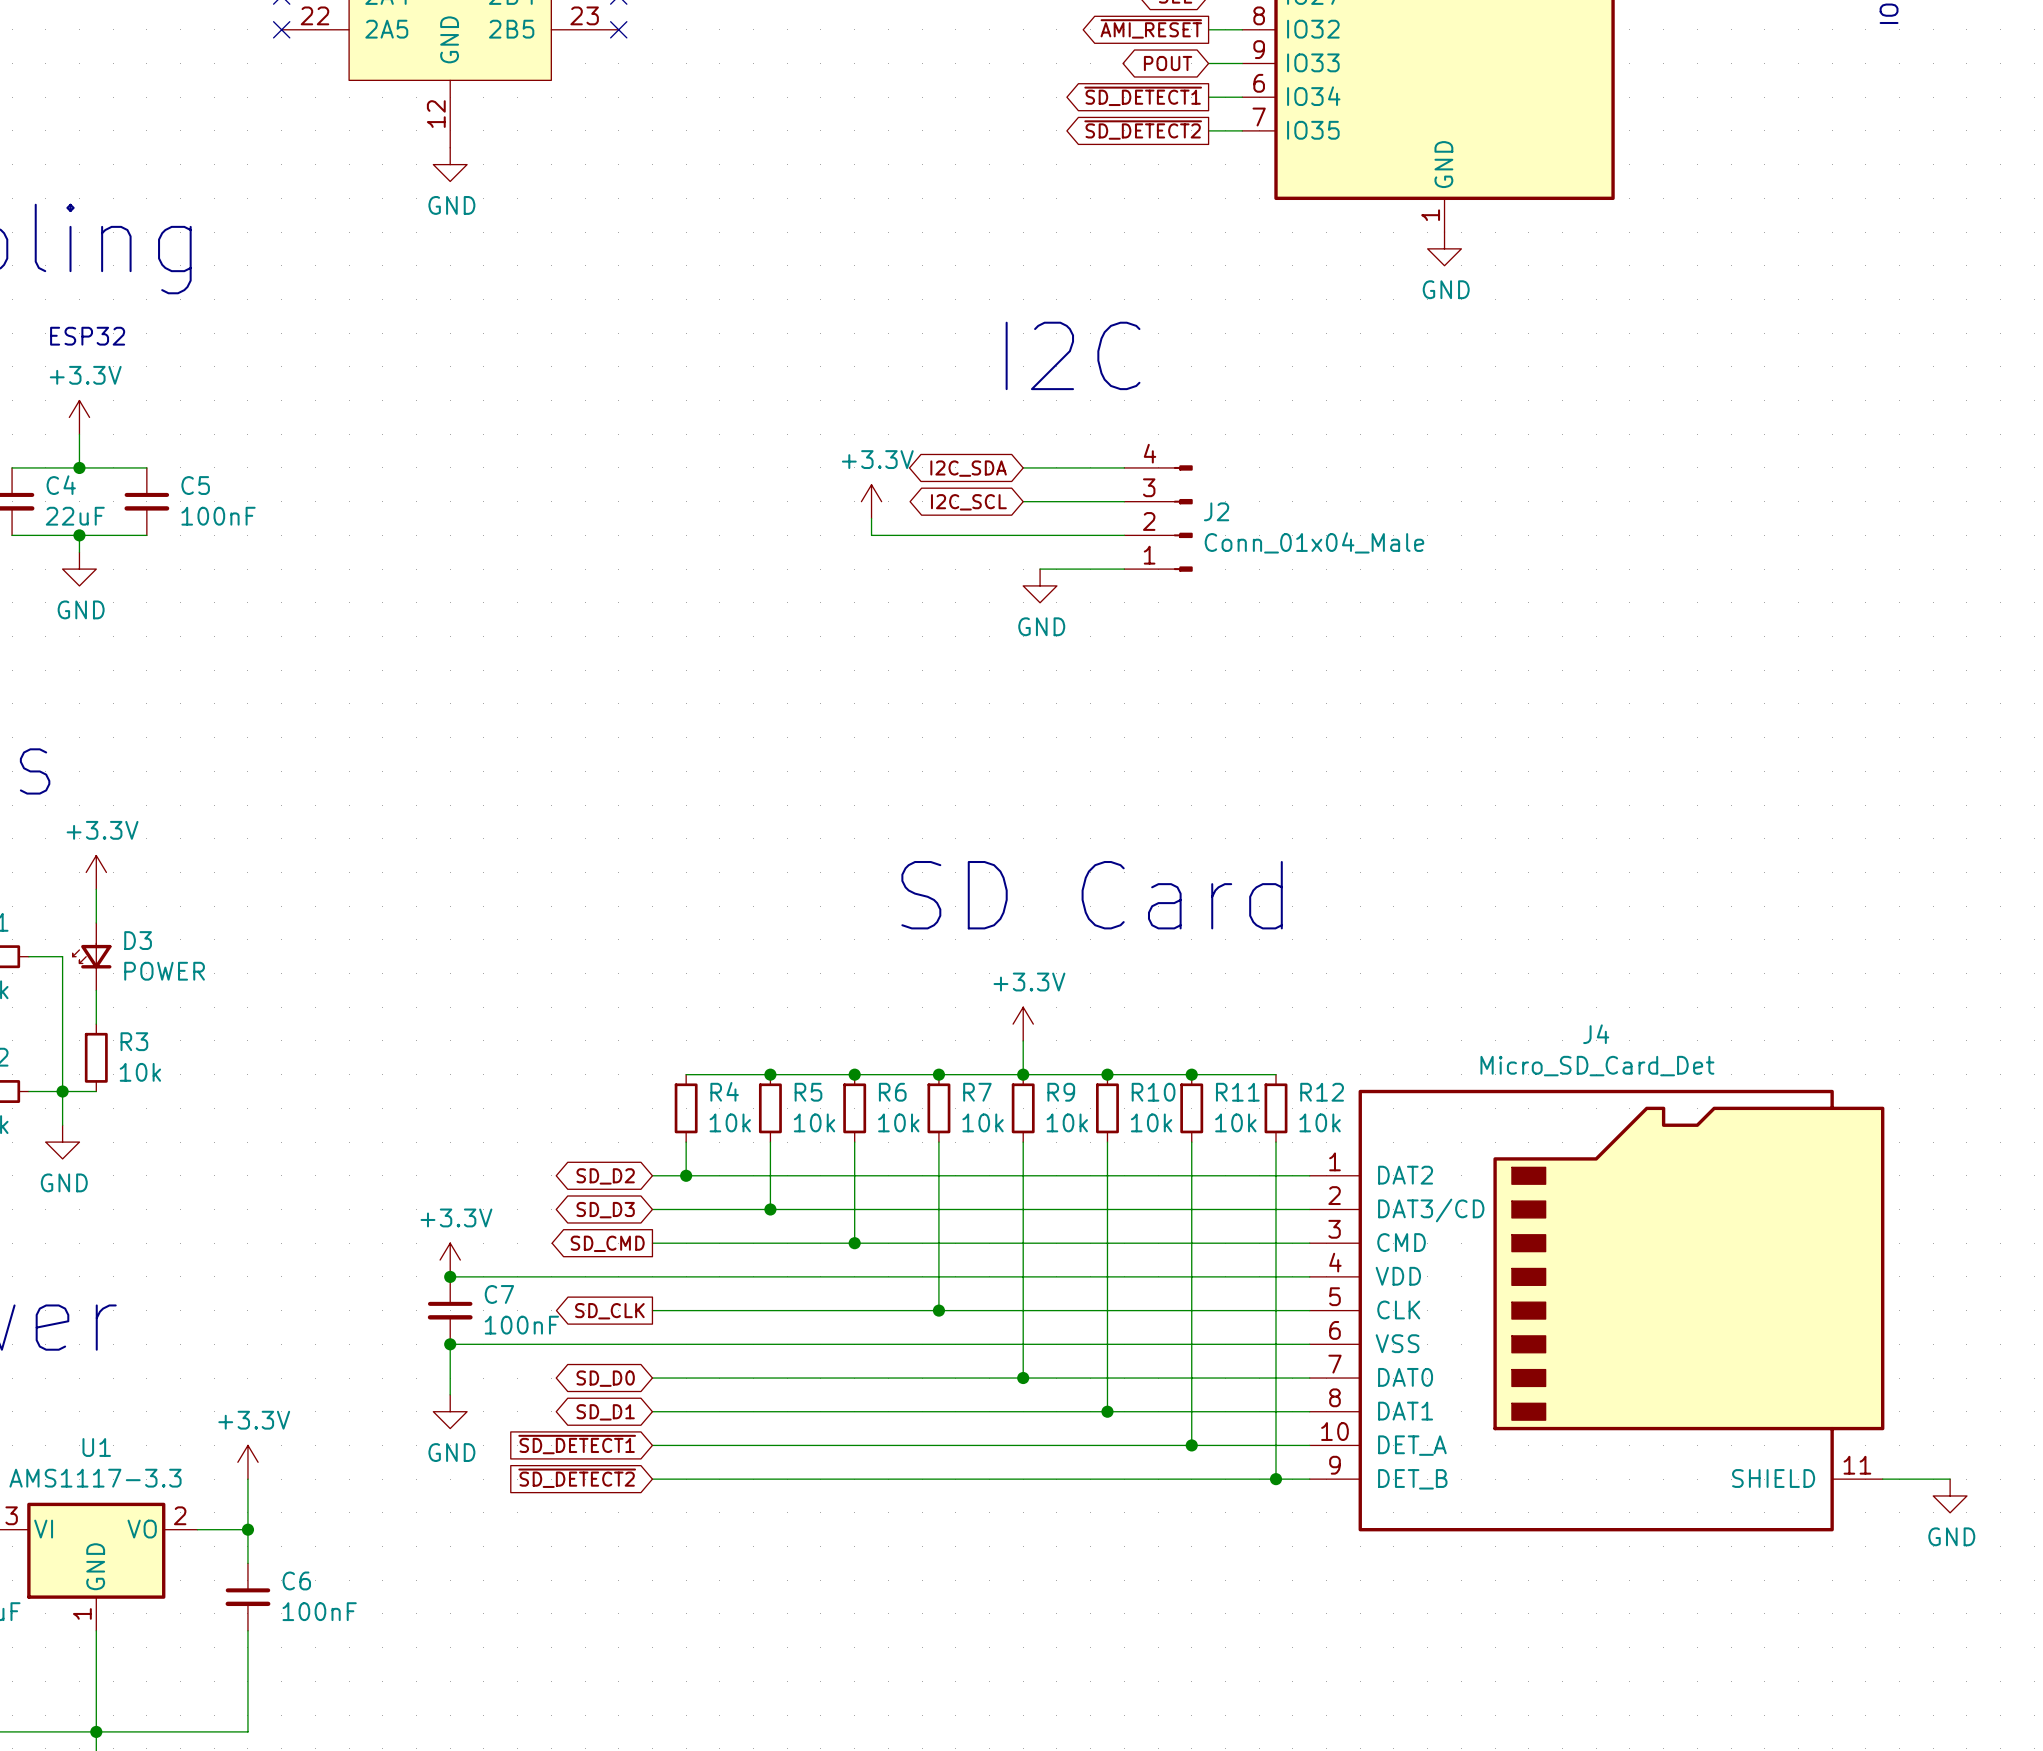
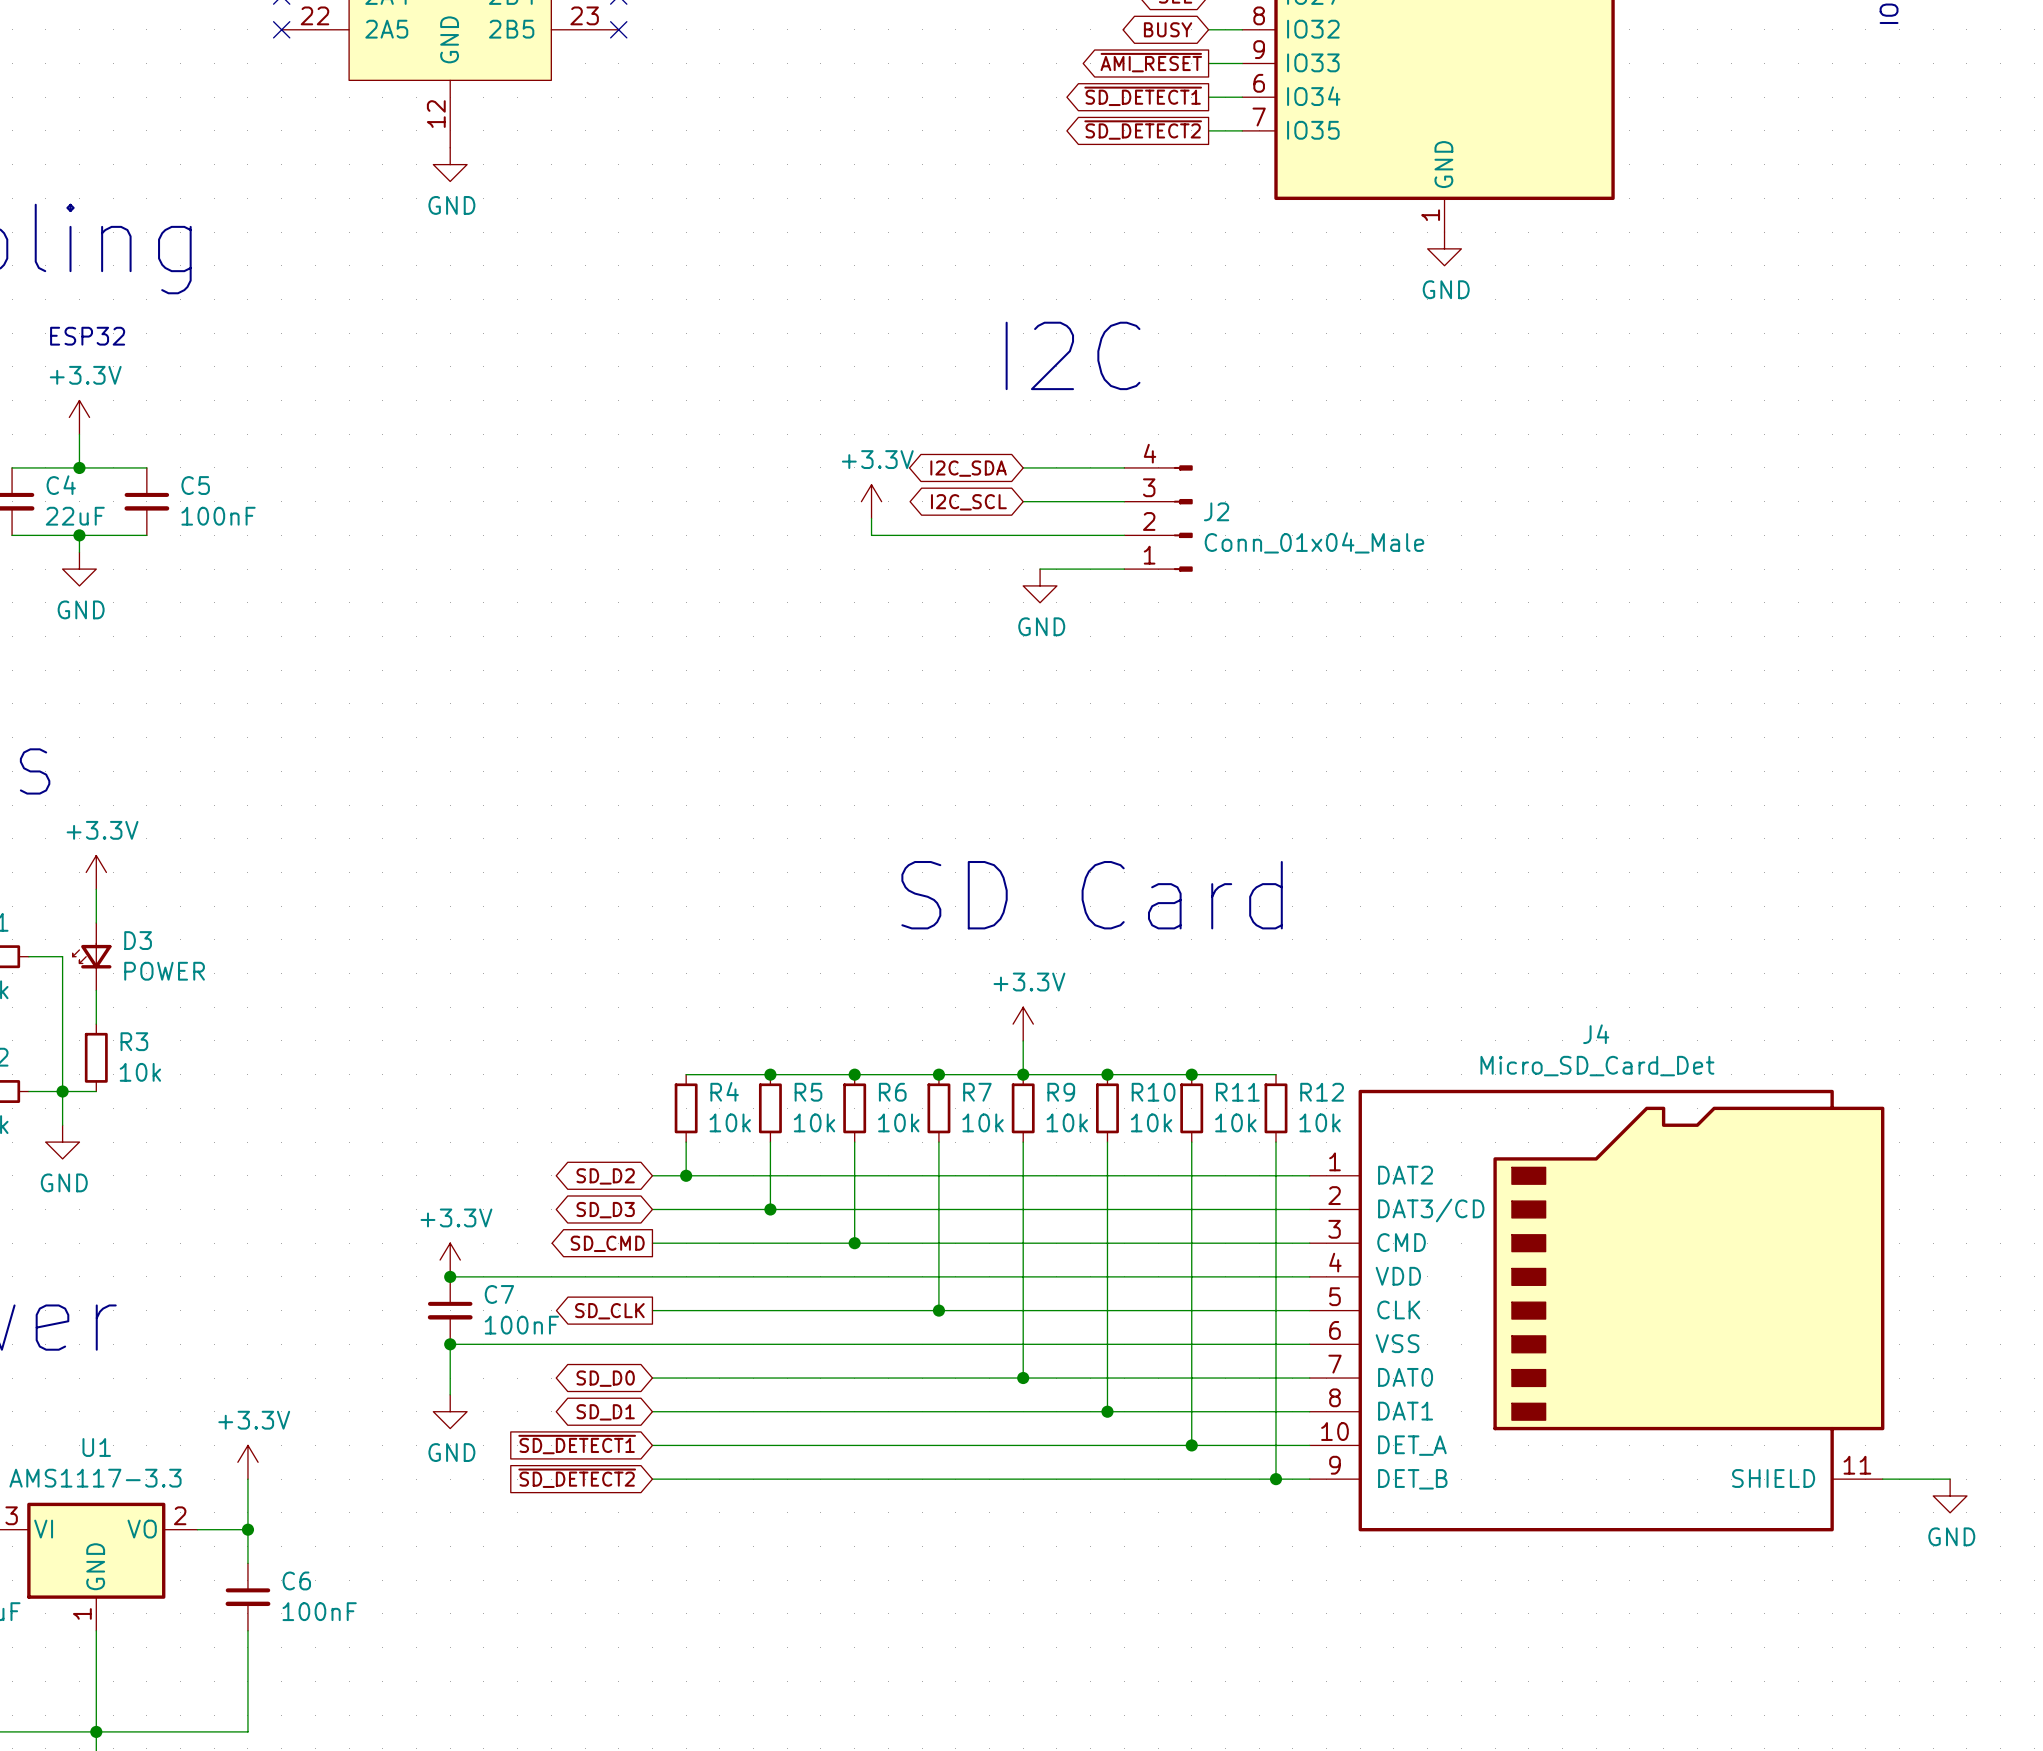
global label shape: output (1151, 28) -> bidirectional (1168, 29)
global label: ~{AMI_RESET} (1151, 28) -> BUSY (1168, 29)
global label shape: bidirectional (1168, 63) -> output (1151, 62)
global label: POUT (1168, 63) -> ~{AMI_RESET} (1151, 62)

